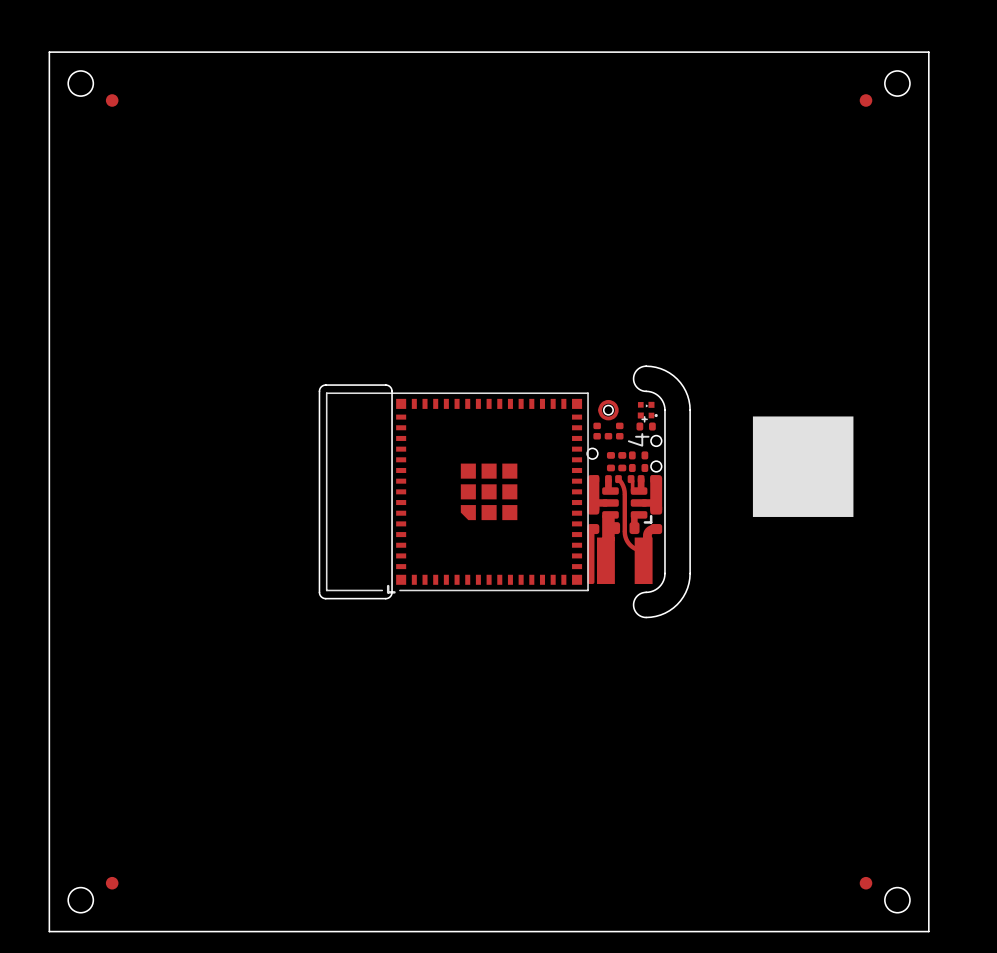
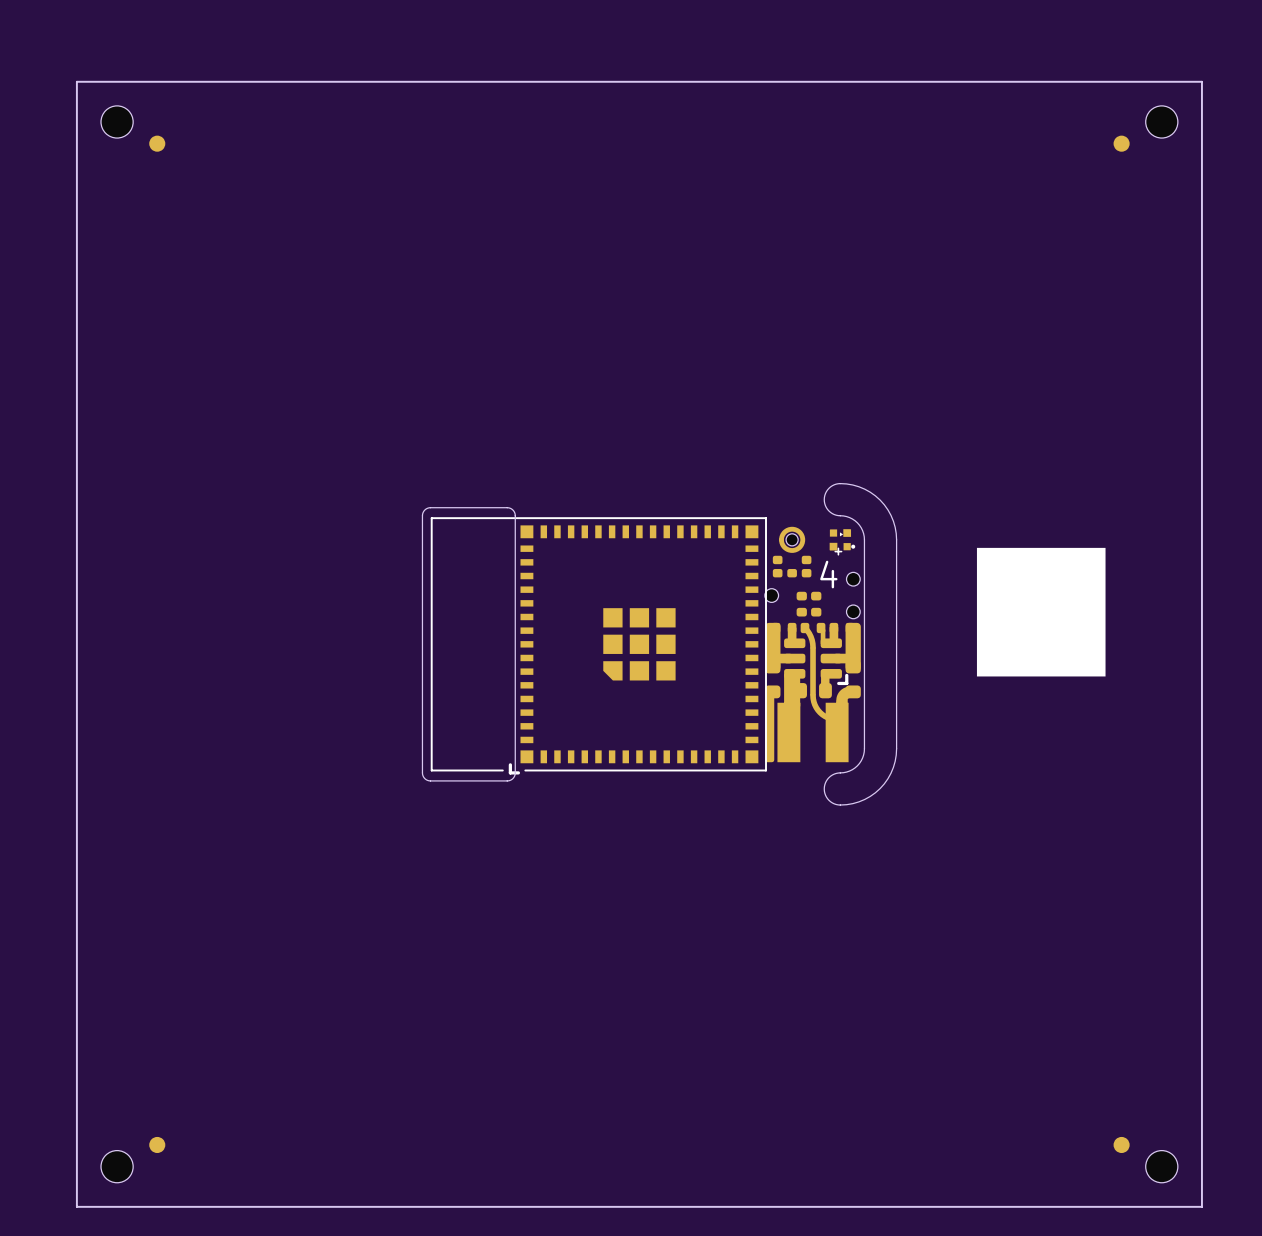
part: (646, 426) -> none
text rotation: 0° (638, 439) -> 90° clockwise (828, 574)
part: (638, 455) -> none
part: none -> (801, 604)
part: none -> (816, 604)
part: (610, 461) -> none
part: (622, 461) -> none
part: (638, 467) -> none

